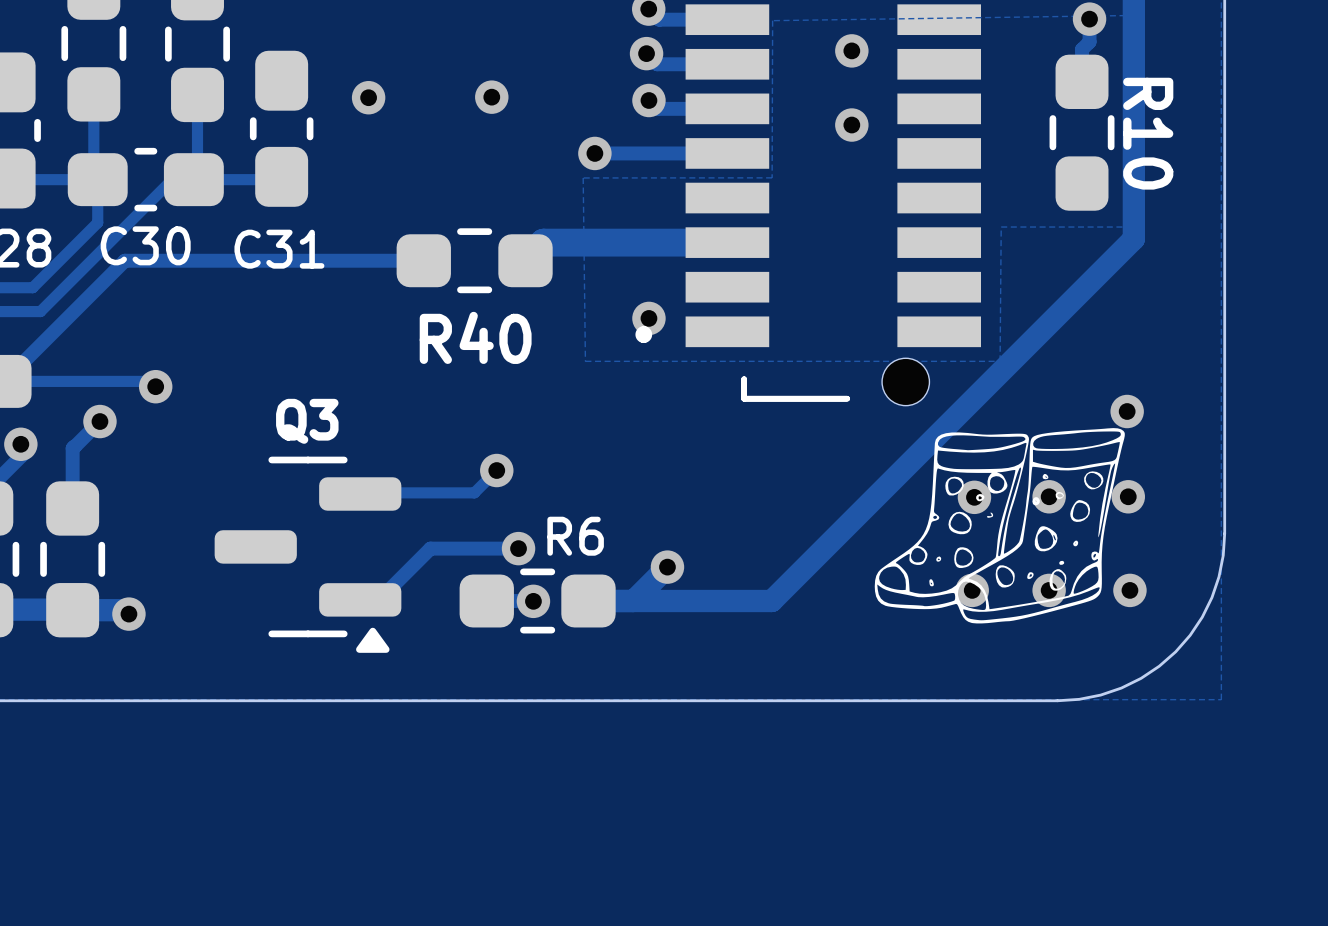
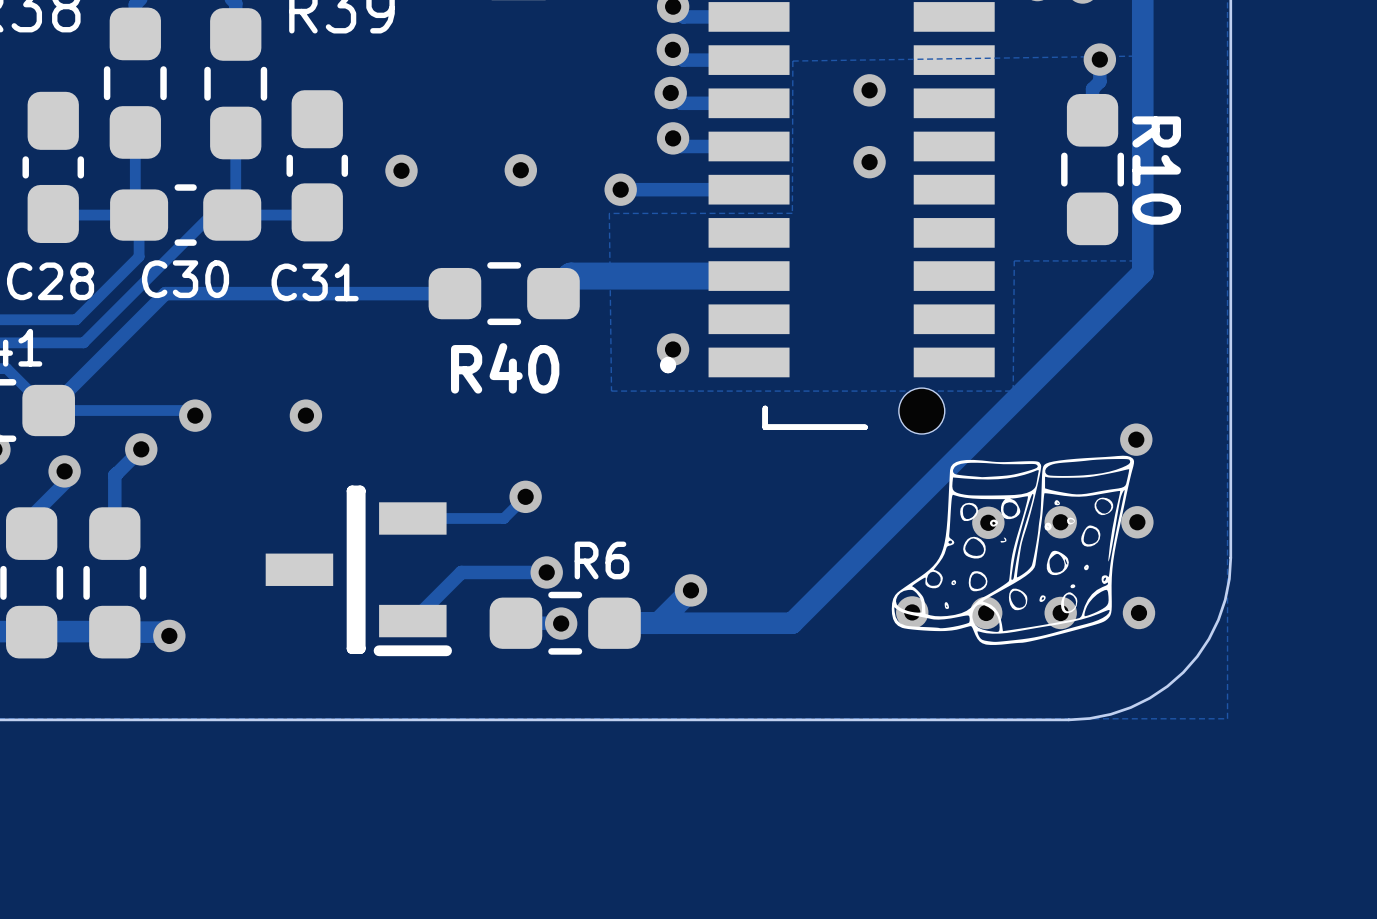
via position: (368, 97) -> (401, 170)
via position: (491, 97) -> (520, 170)
via: none -> (305, 415)
part: none -> (358, 570)
Q3: (308, 554) -> none
via: none -> (912, 612)

